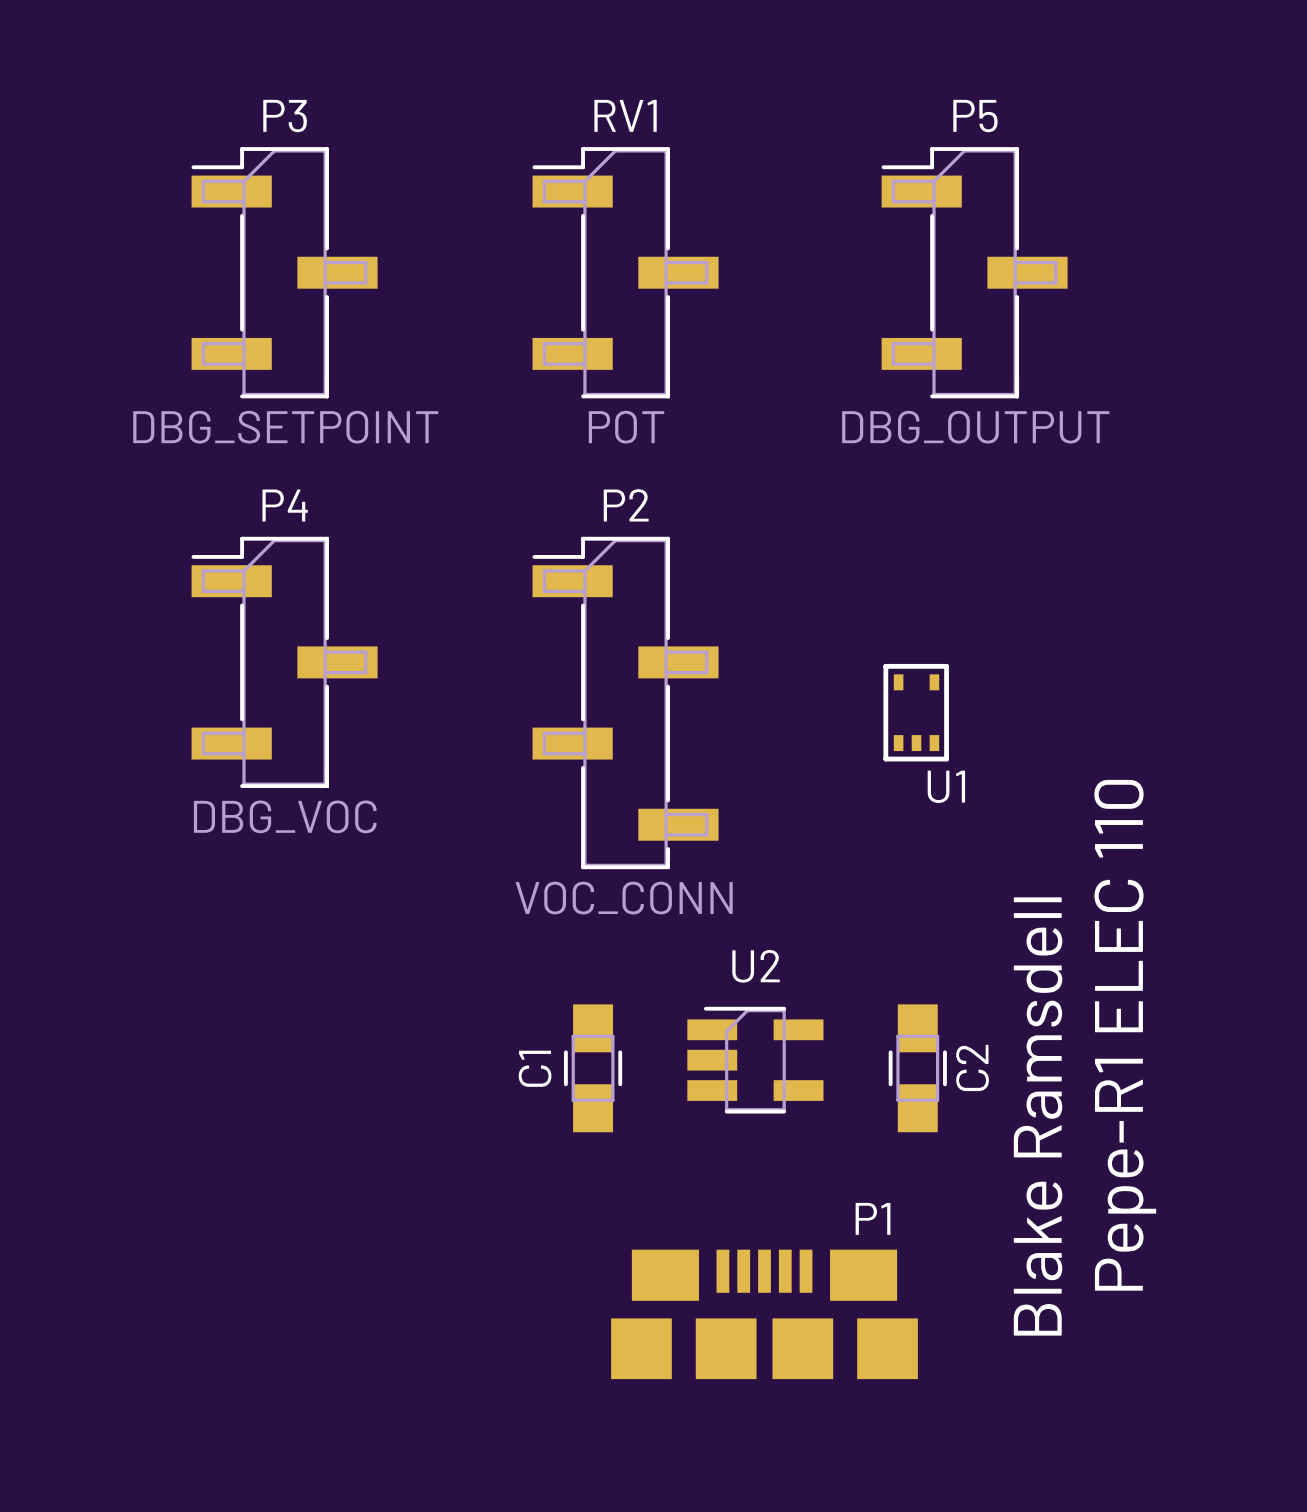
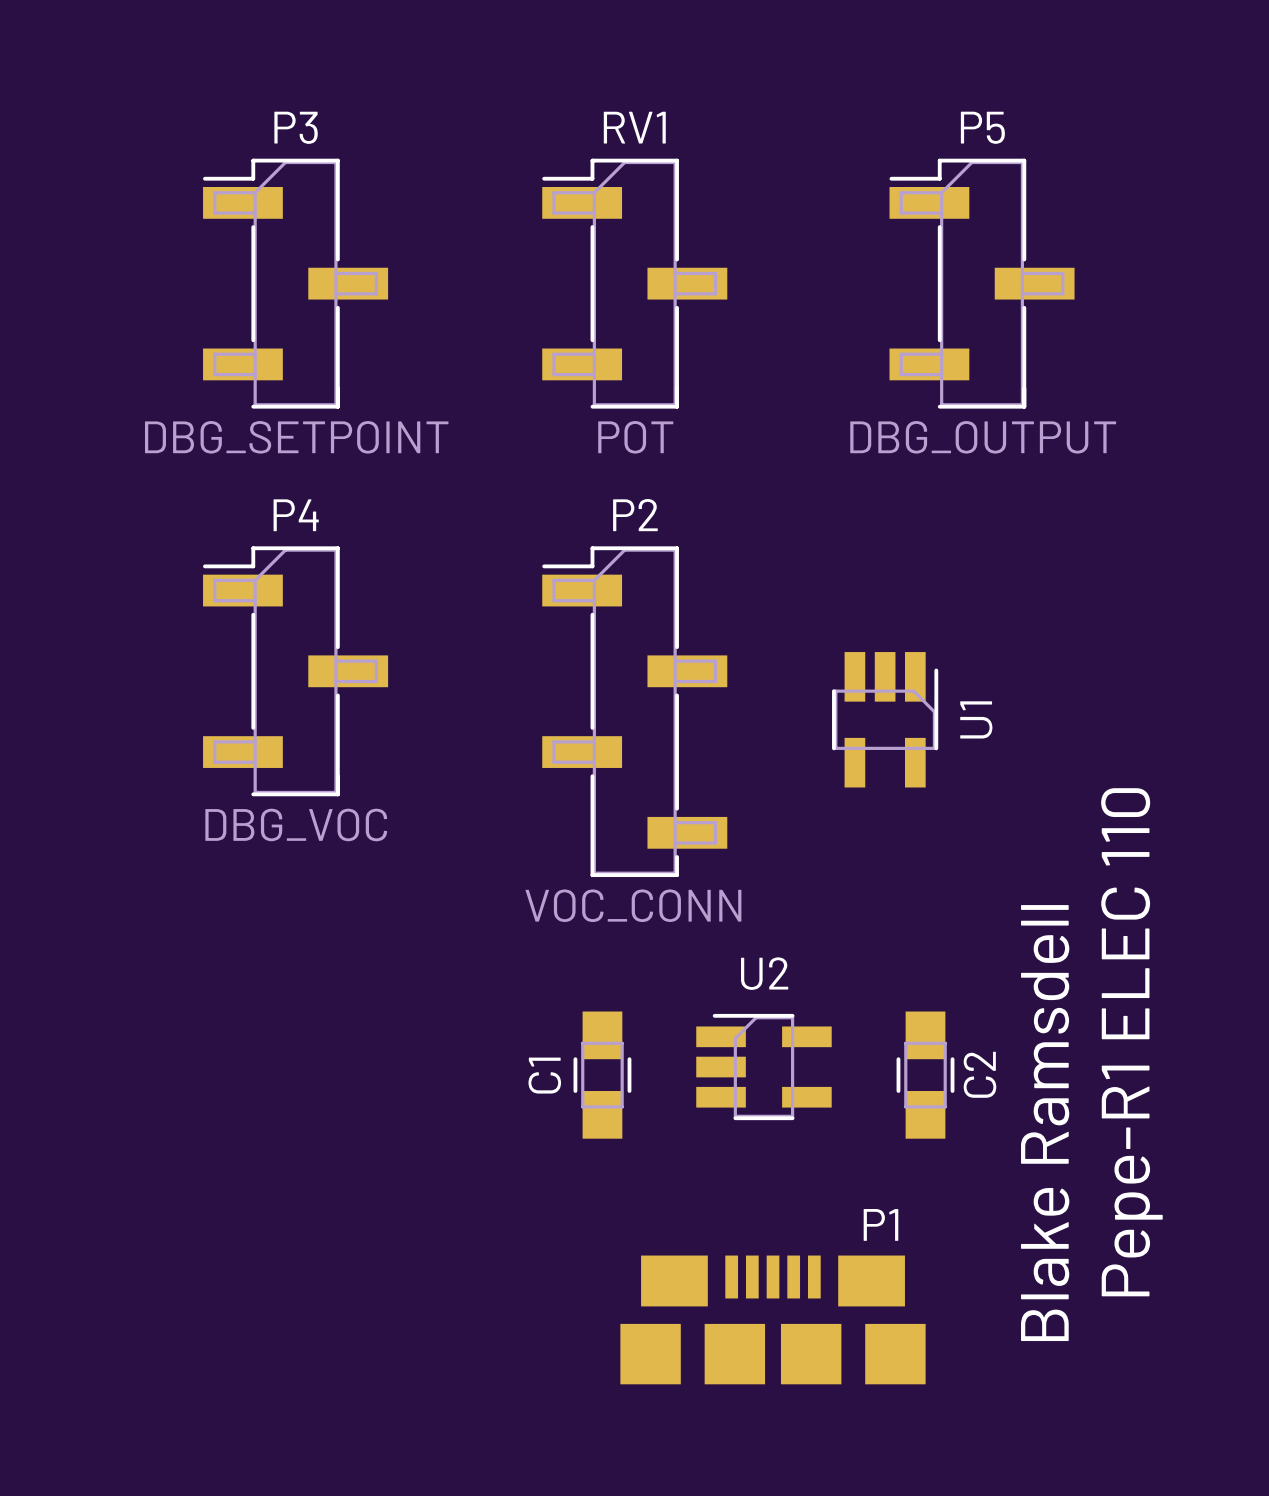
U1 footprint: [883, 663, 949, 762] -> [832, 652, 939, 788]
U1 name position: U1 (946, 786) -> U1 (976, 719)

